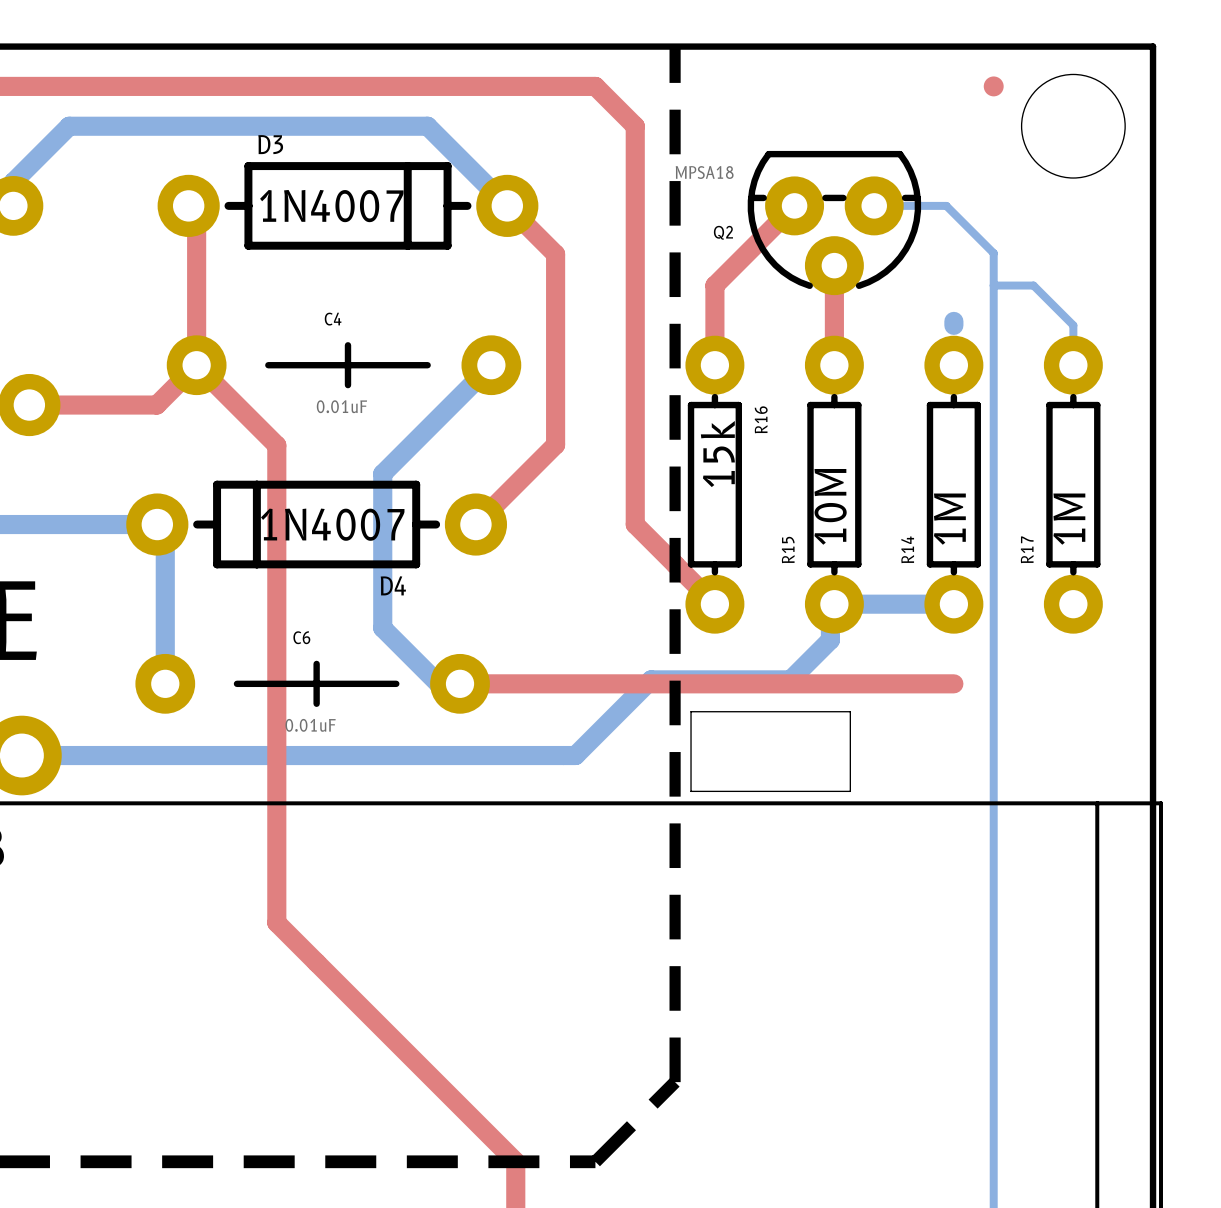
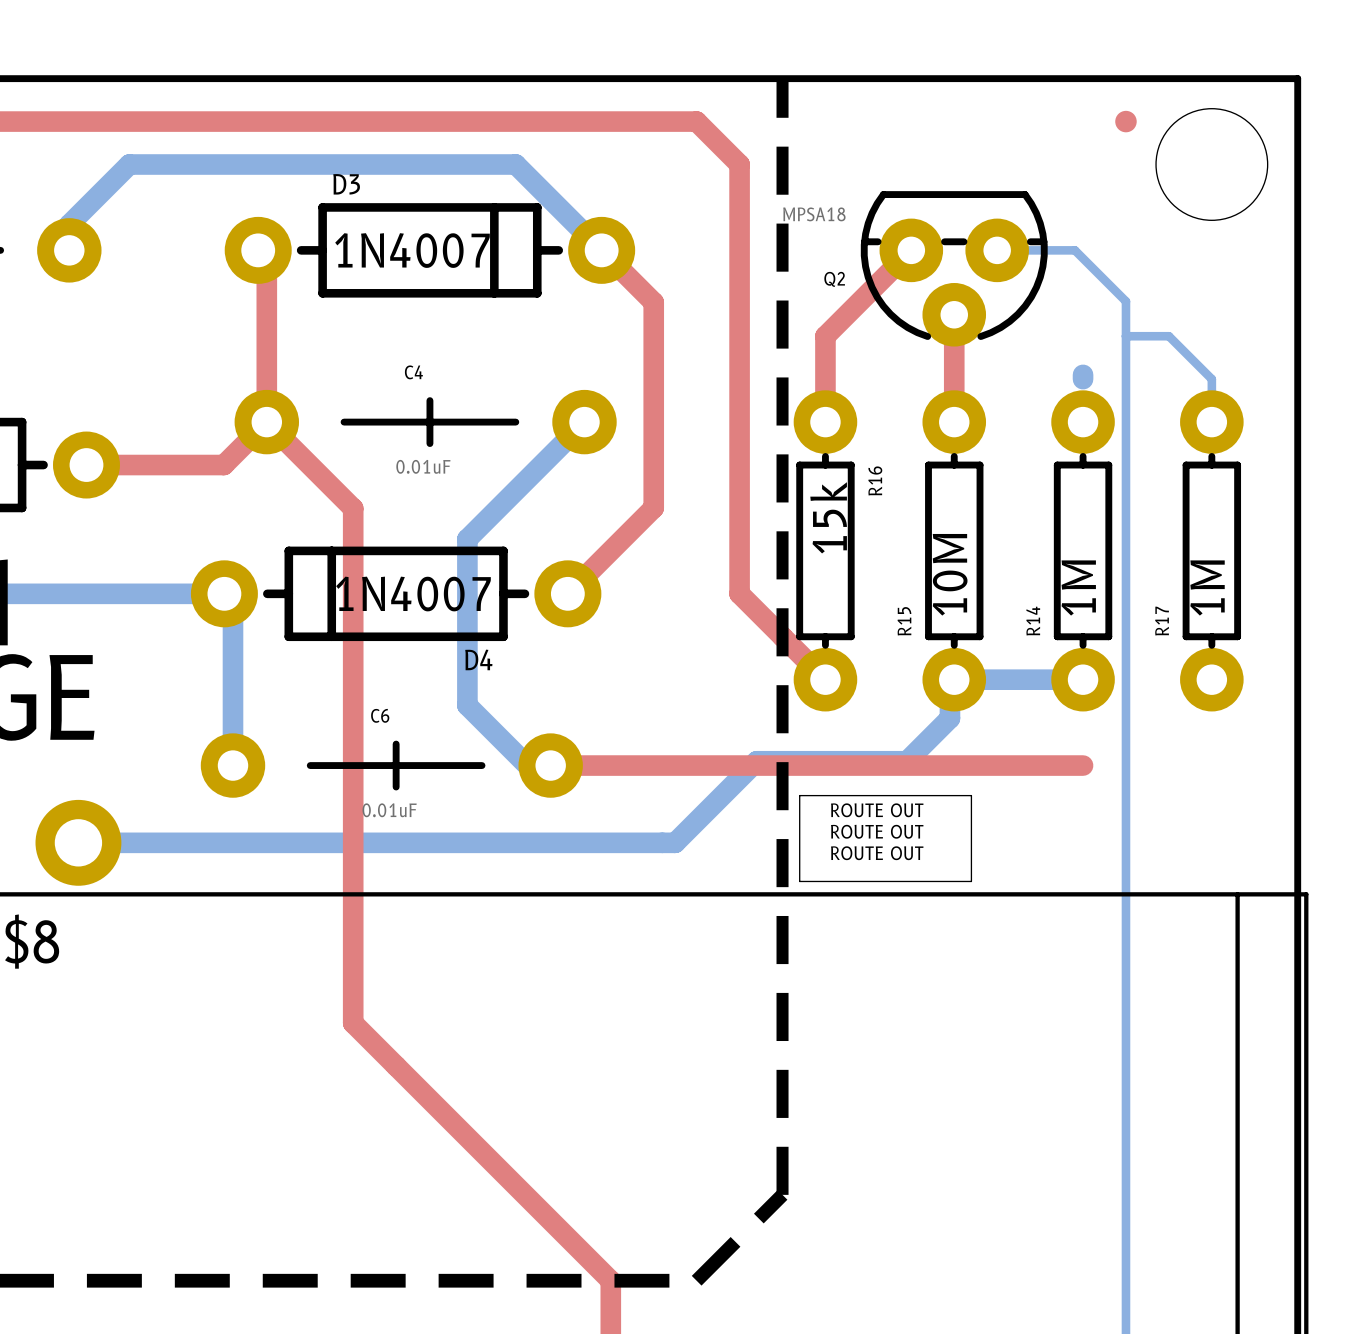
text: none -> ROUTE OUT (877, 810)
text: none -> ROUTE OUT (877, 831)
text: none -> ROUTE OUT (877, 853)

